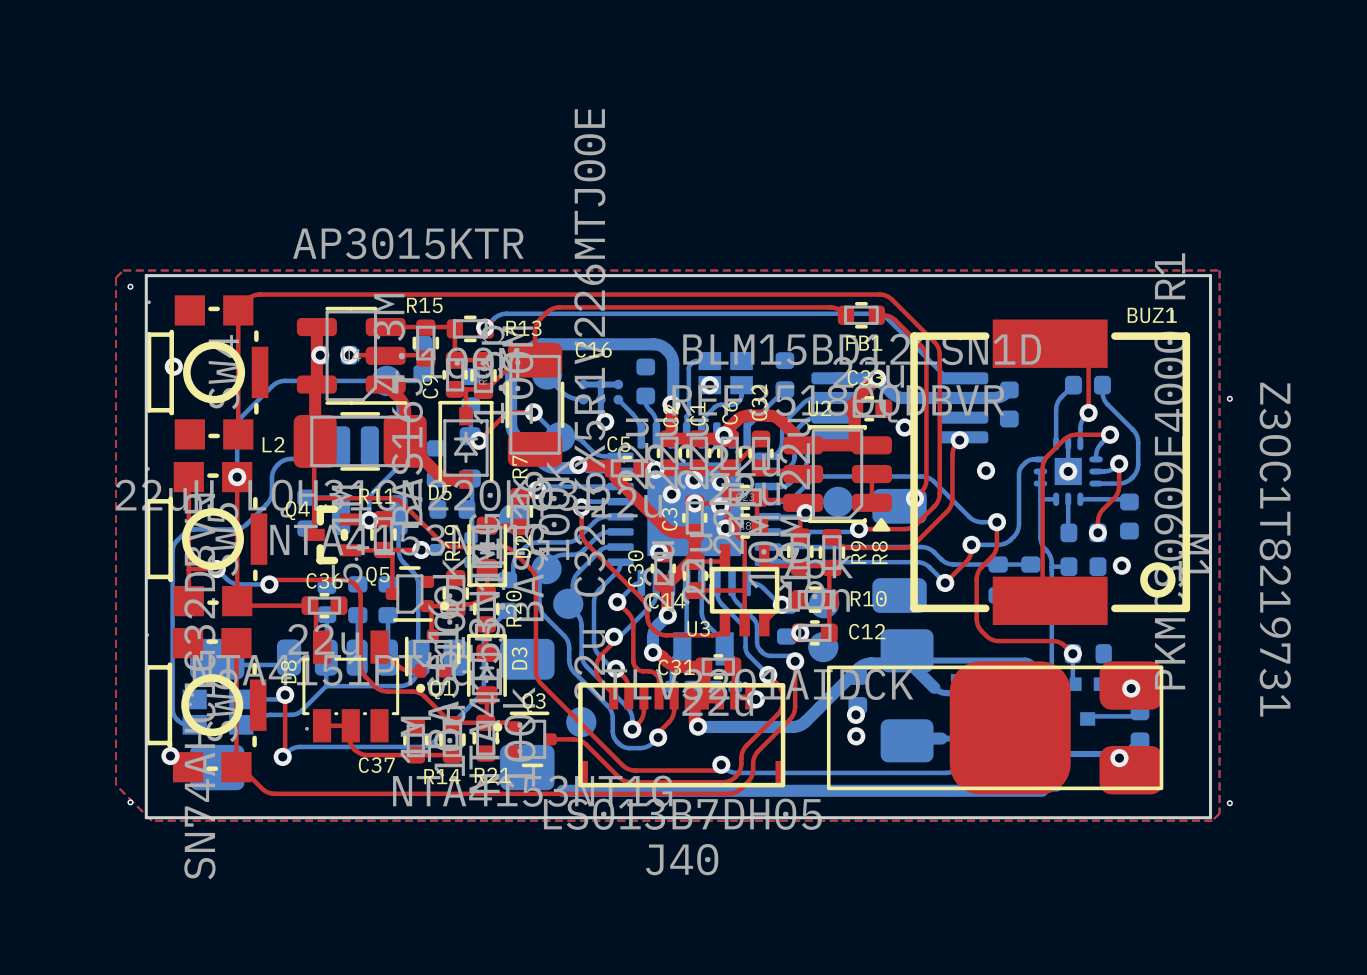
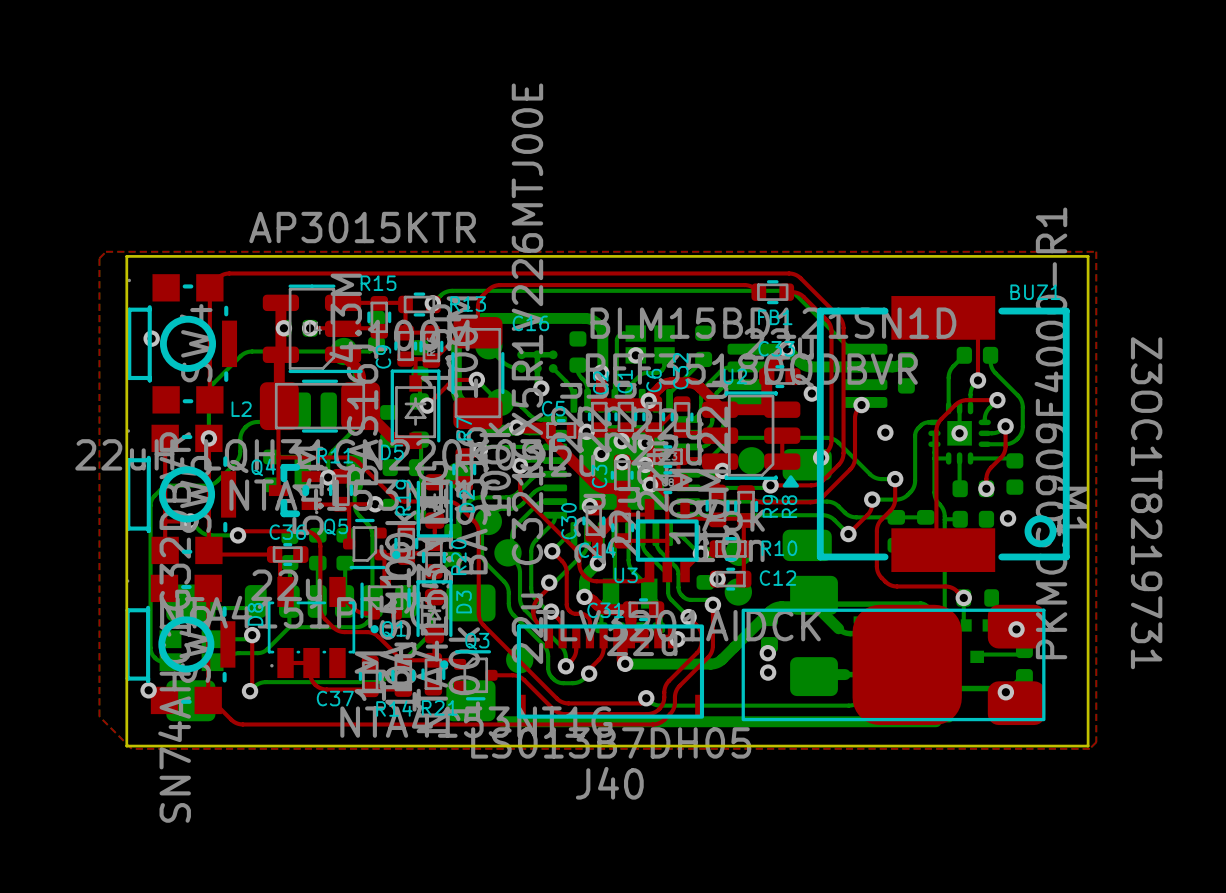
via: (130, 286) -> none
via: (1229, 398) -> none
via: (130, 802) -> none
via: (1229, 803) -> none

